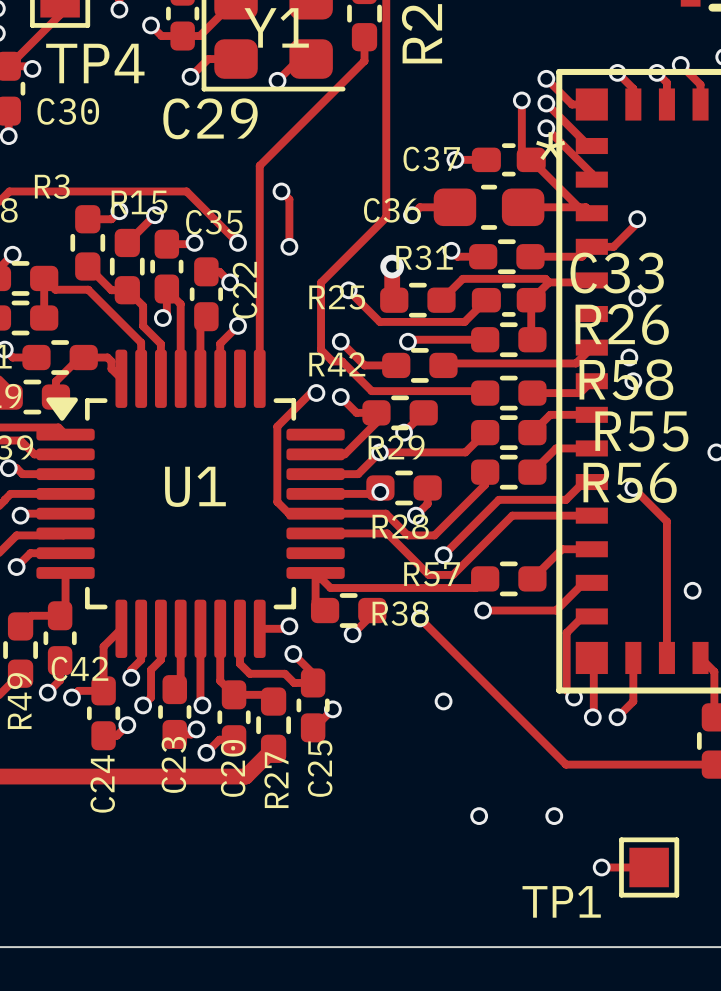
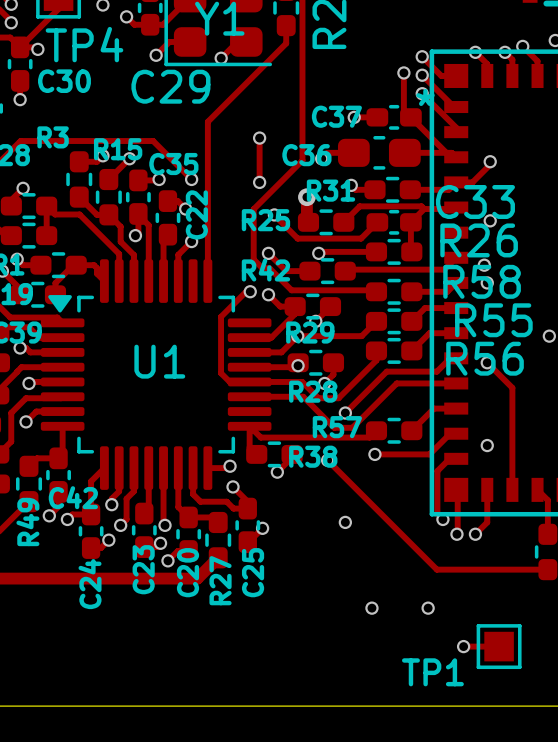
track: none -> (259, 138) (259, 182)
via: none -> (259, 138)
track: (281, 191) (289, 199) (289, 246) -> none
via: (281, 191) -> none
via: (289, 246) -> none
via: none -> (259, 182)
via position: (692, 590) -> (487, 445)

